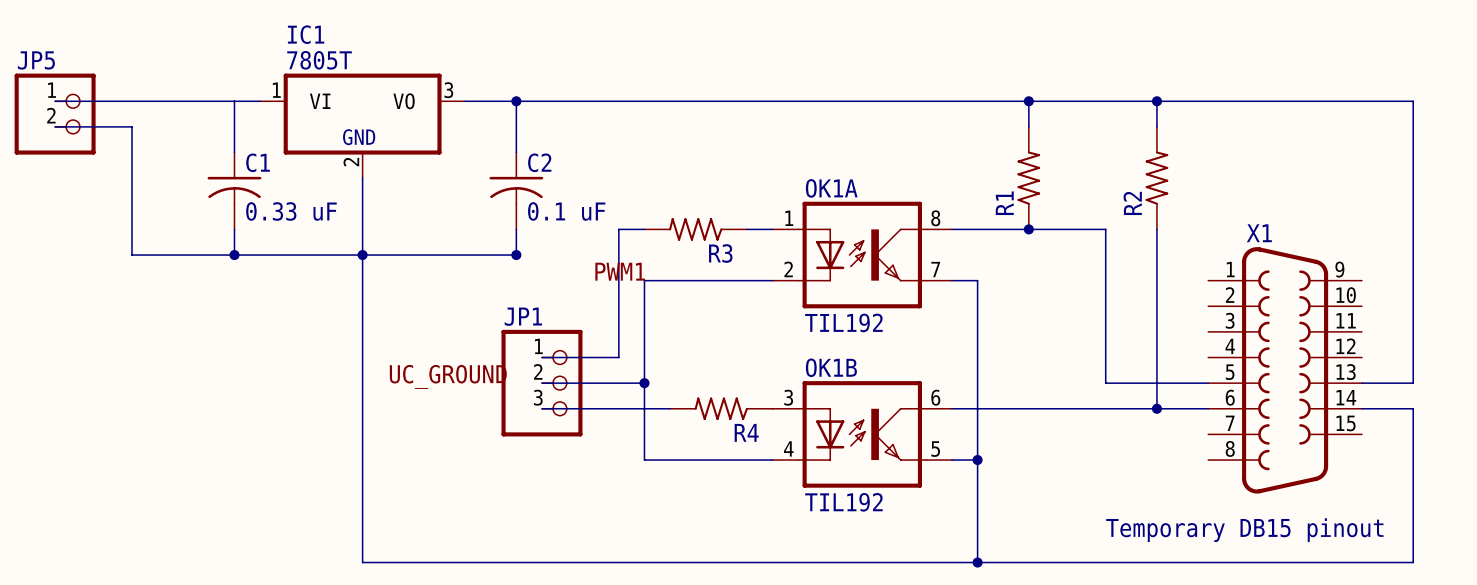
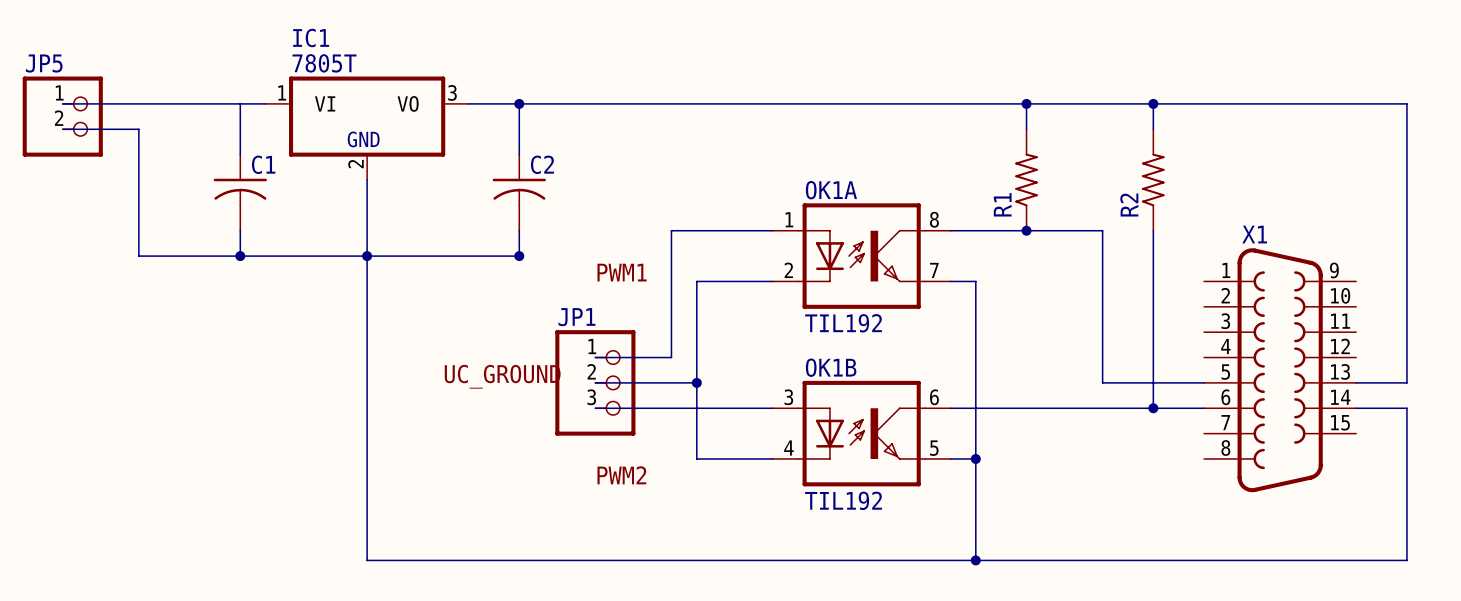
C1 value: 0.33 uF (291, 211) -> none
C2 value: 0.1 uF (566, 211) -> none
wire: (644, 229) (618, 229) (618, 357) -> (747, 230) (671, 230) (671, 357) (620, 357)
R3: (695, 229) -> none
wire: (695, 280) (644, 280) (644, 460) (695, 460) -> (696, 281) (696, 458)
wire: (541, 357) (593, 357) -> none
label position: UC_GROUND (448, 376) -> UC_GROUND (502, 376)
wire: (541, 383) (593, 383) -> (646, 382) (696, 382)
JP1 position: (541, 383) -> (595, 382)
junction position: (644, 383) -> (696, 382)
wire: (541, 408) (593, 408) -> none
R4: (721, 408) -> none
label: none -> PWM2 (621, 475)
text: Temporary DB15 pinout (1244, 530) -> none

